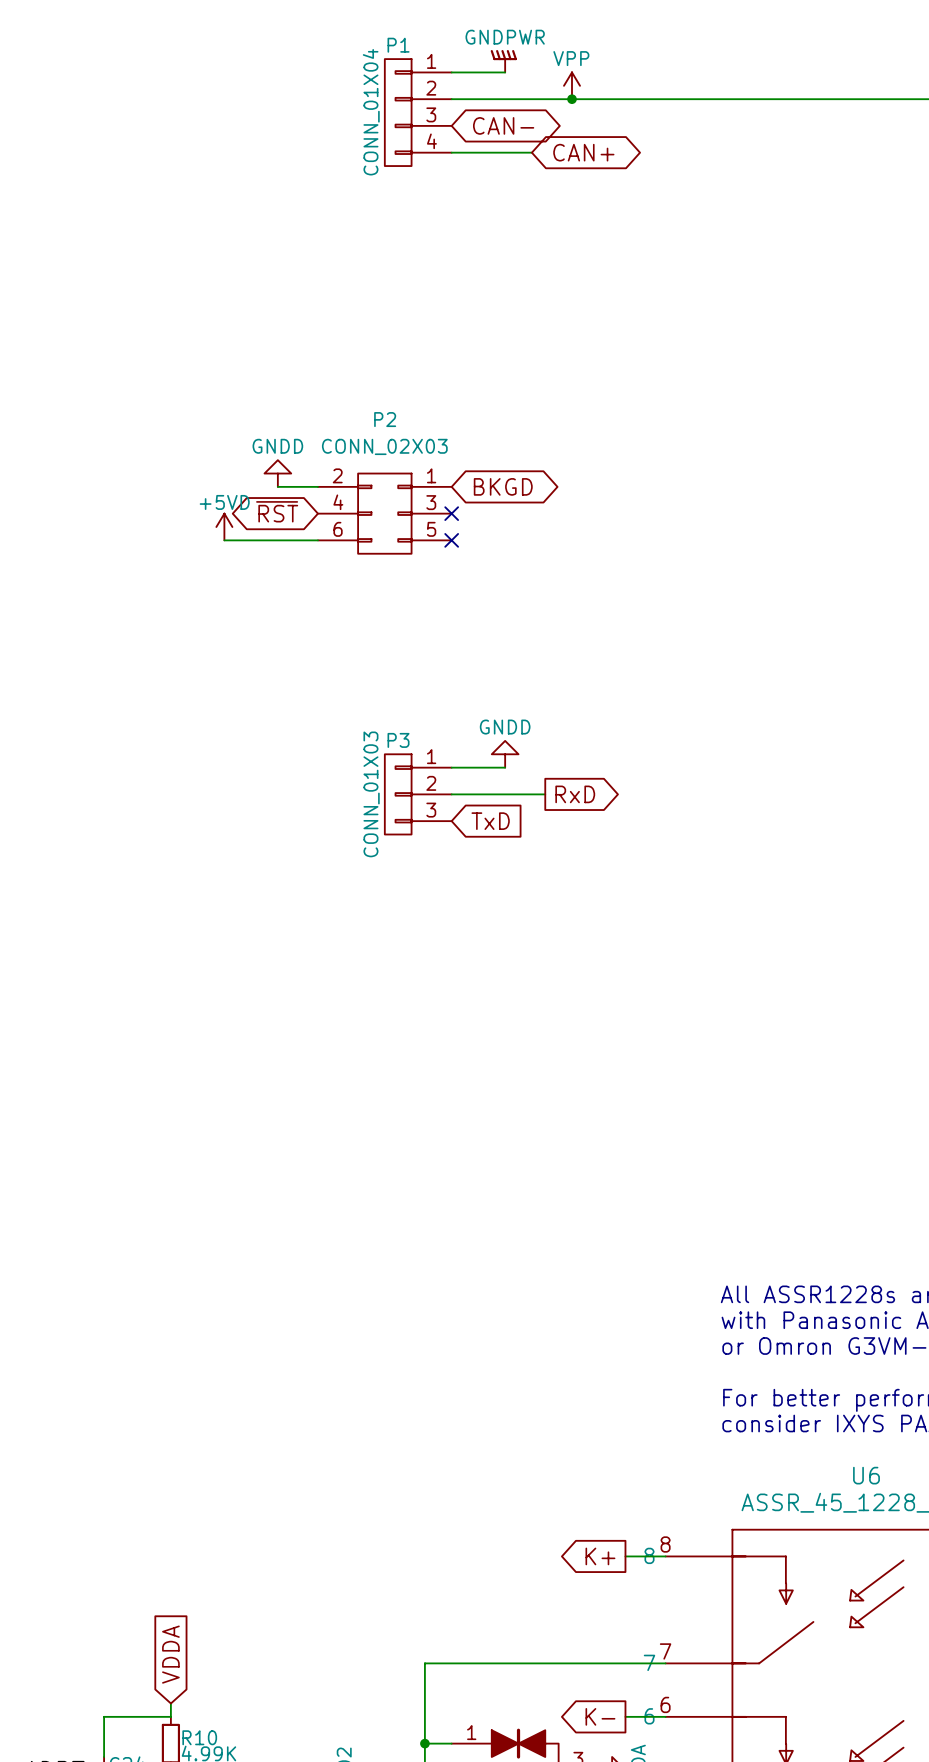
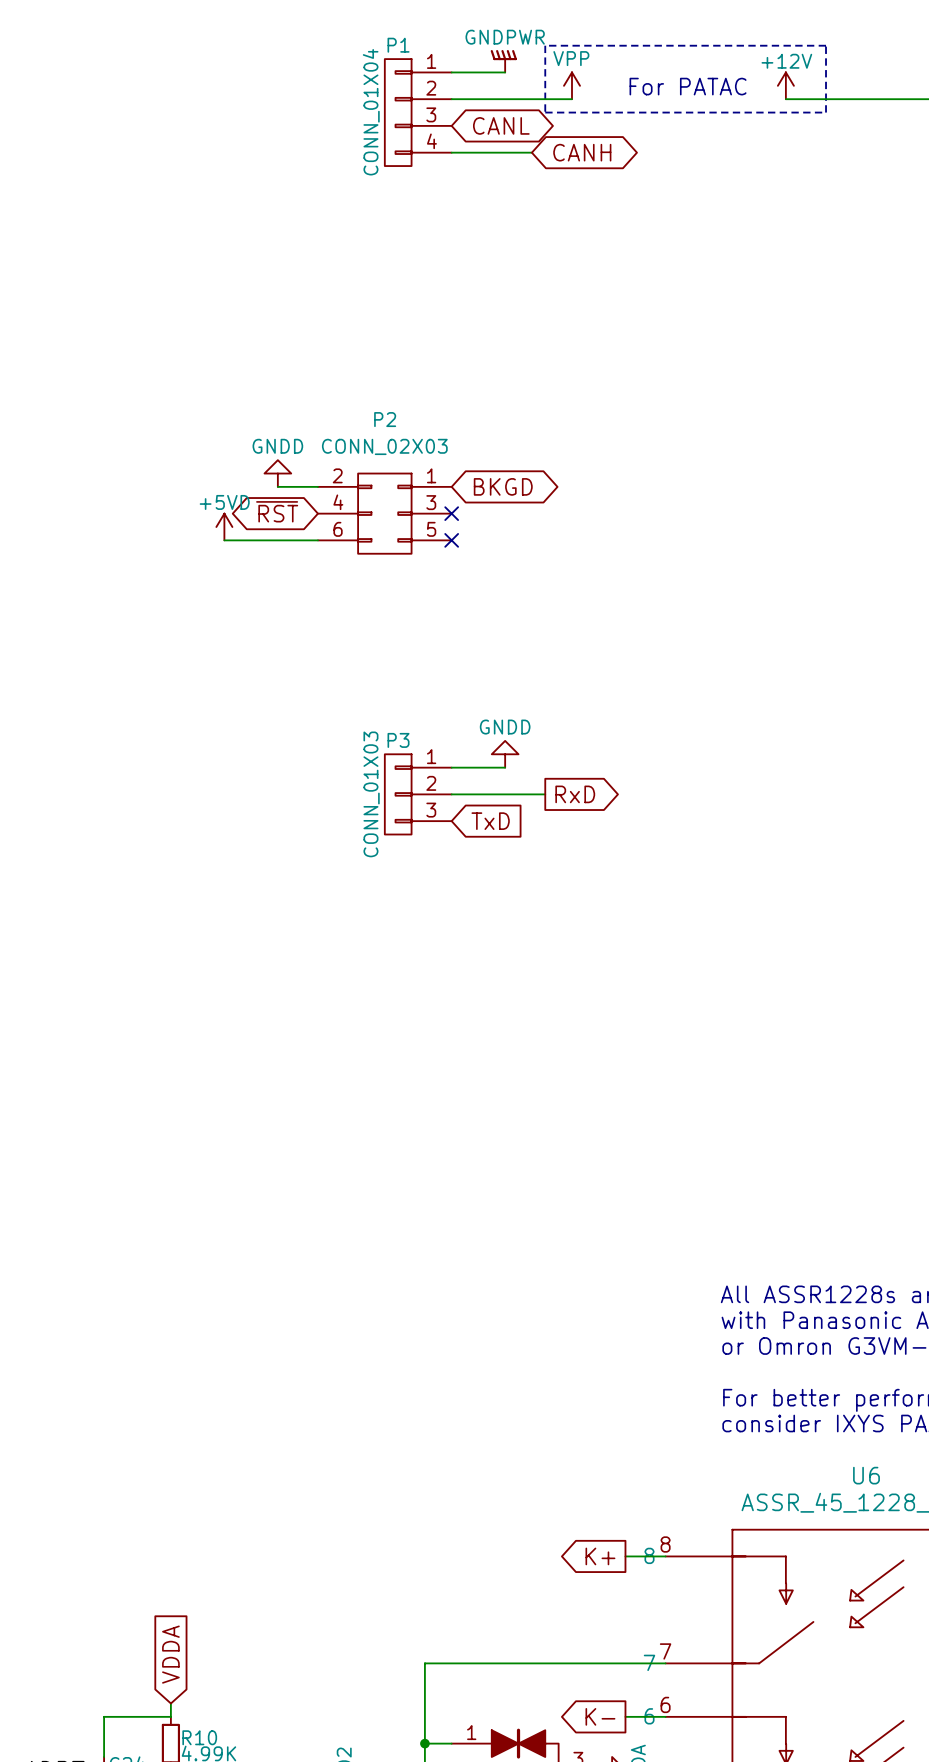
line: none -> (545, 45) (545, 112) (826, 112) (826, 45) (545, 45)
power symbol: none -> +12V (785, 85)
text: none -> For PATAC (688, 86)
wire: (571, 99) (785, 99) -> none
junction: (571, 99) -> none
global label: CAN- (503, 125) -> CANL (501, 125)
global label: CAN+ (583, 152) -> CANH (582, 152)

